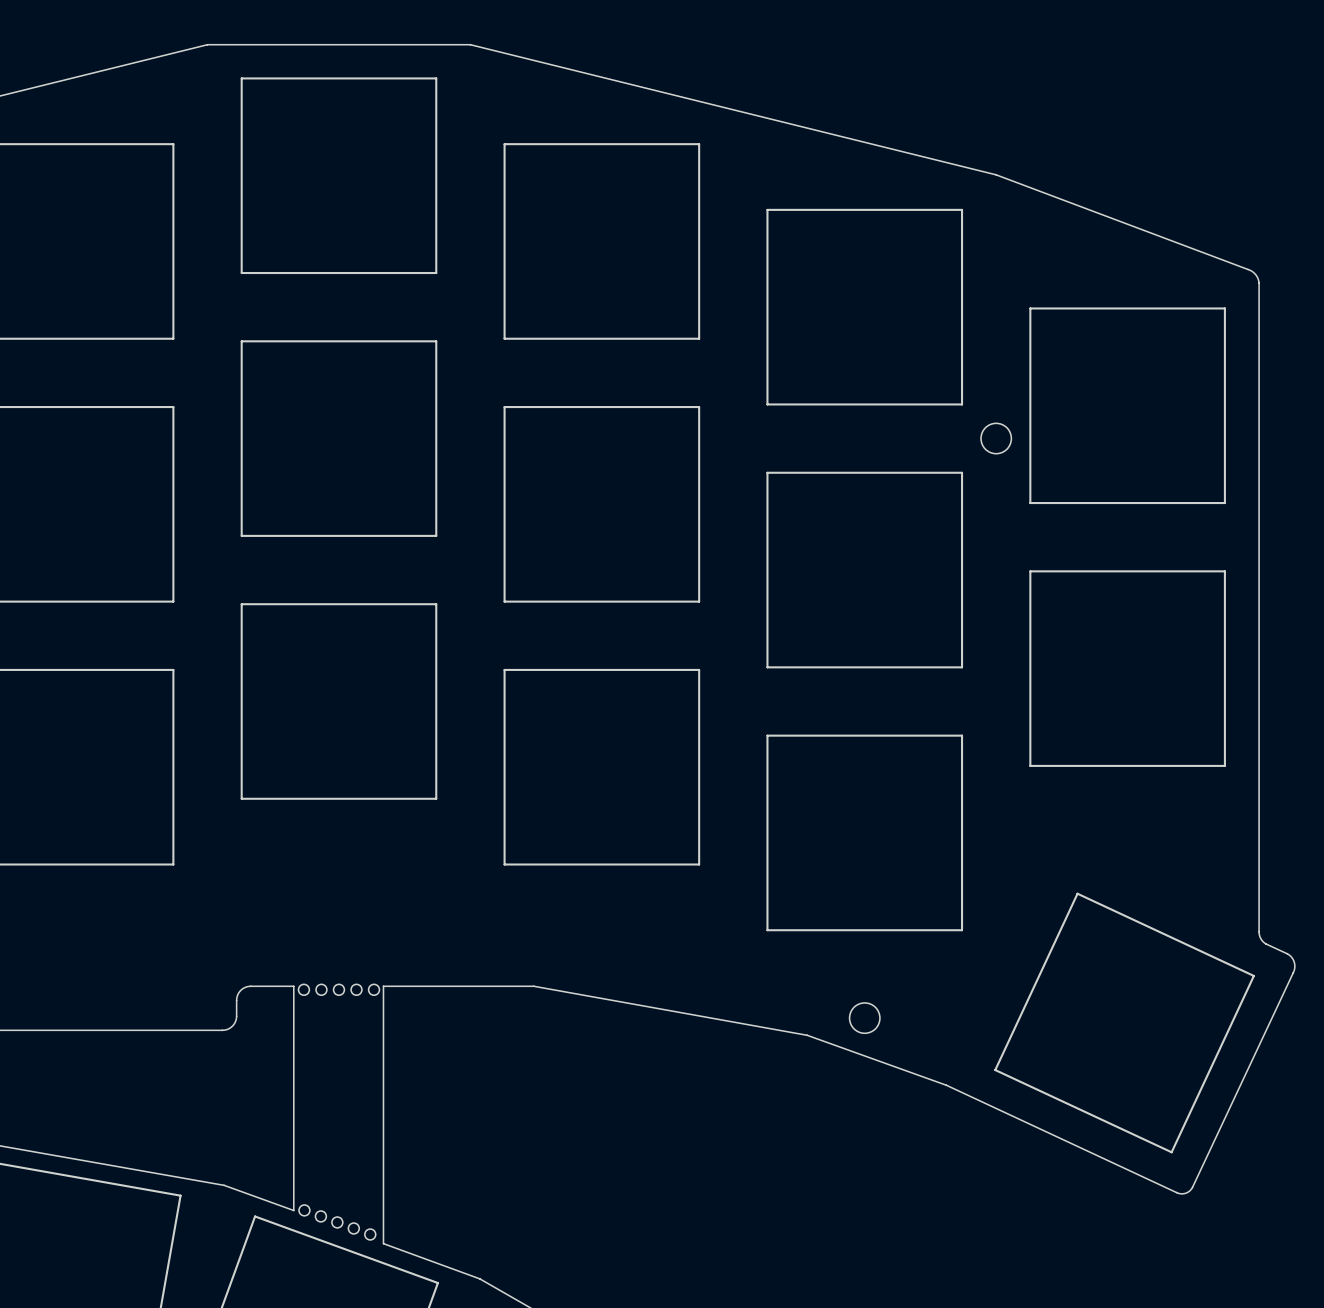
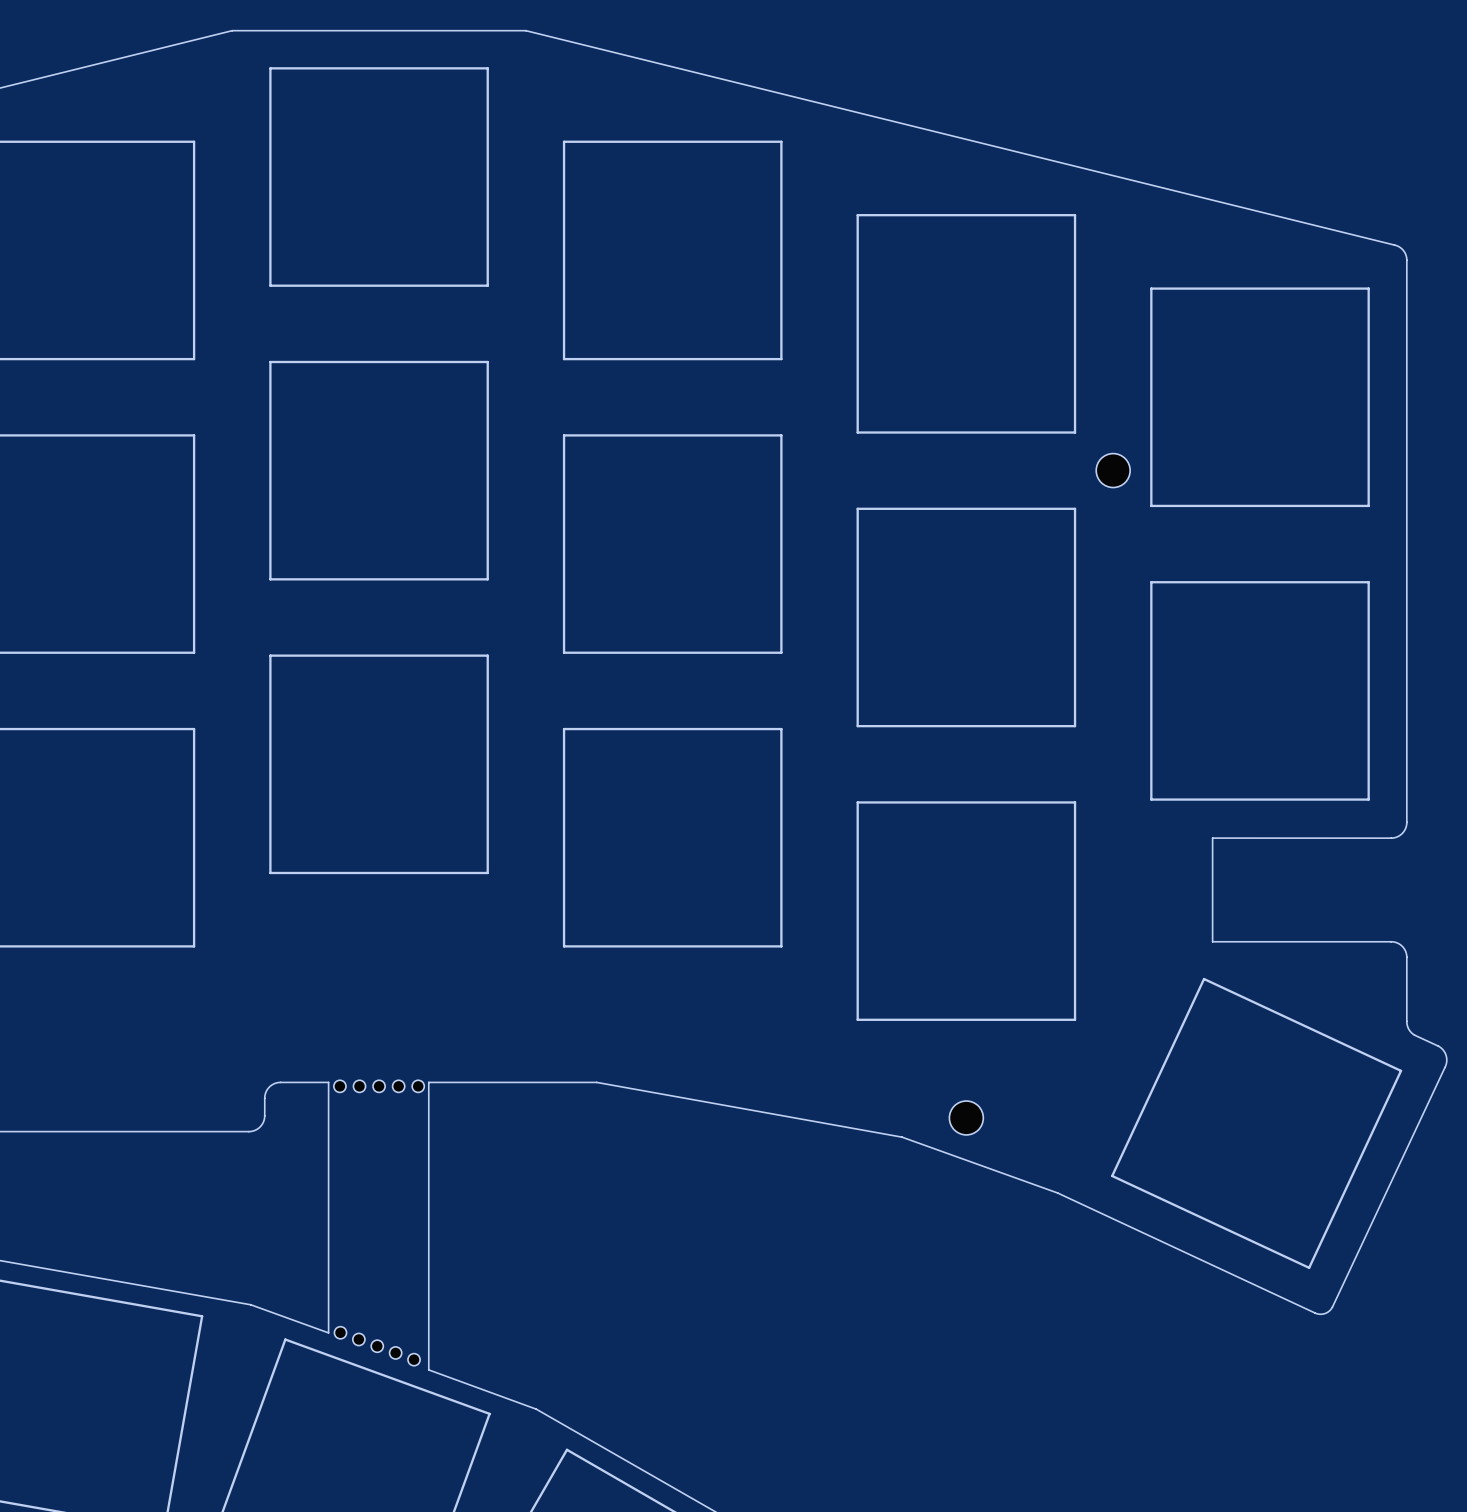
board edge: (470, 44) (996, 174) (1249, 270) (1255, 274) (1259, 283) -> (525, 30) (1396, 245) (1402, 249) (1406, 256) (1406, 296)
drawing position: (1127, 405) -> (1260, 397)
drawing position: (1127, 668) -> (1260, 690)
board edge: (1259, 753) (1259, 874) -> (1406, 822) (1402, 833) (1393, 838) (1212, 838) (1212, 941) (1392, 941) (1402, 946) (1406, 957)

